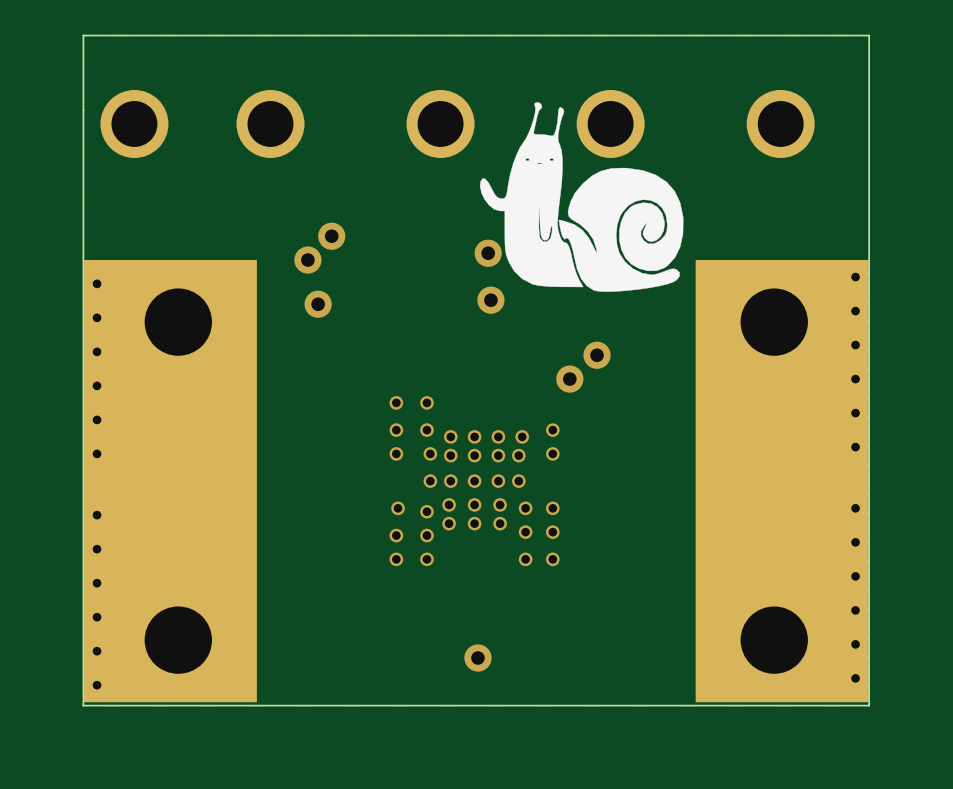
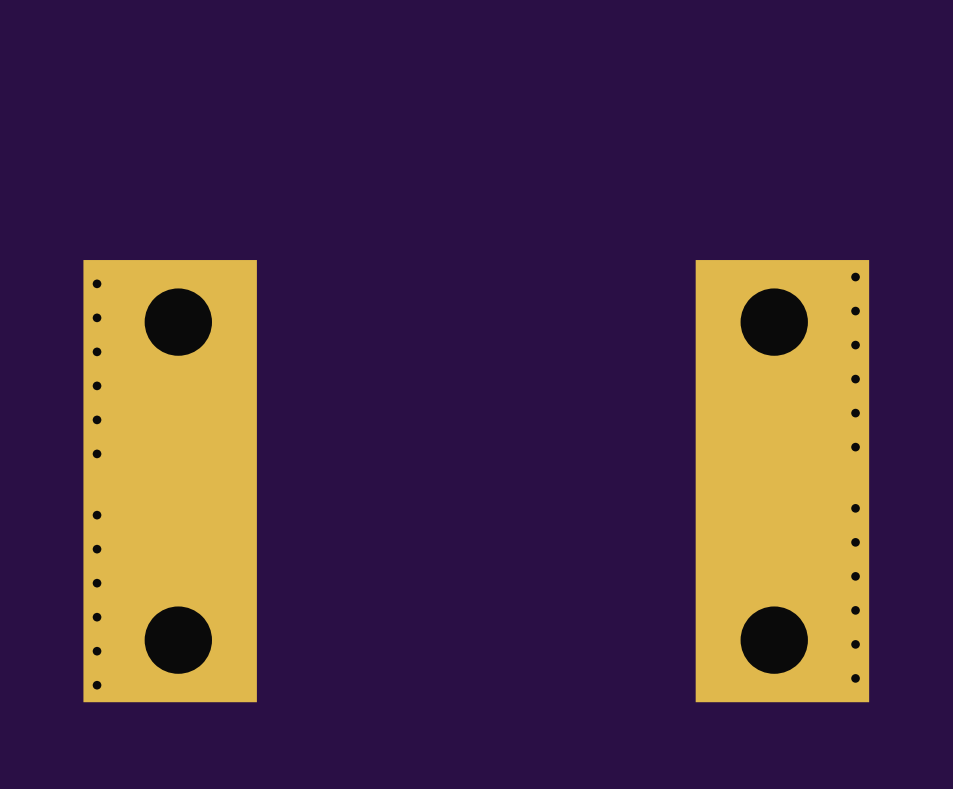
board edge: (869, 35) (869, 705) (83, 705) (83, 35) (869, 35) -> none
drawing: [479, 102, 684, 292] -> none
part: (134, 123) -> none
part: (270, 123) -> none
part: (440, 123) -> none
part: (610, 123) -> none
part: (780, 123) -> none
via: (331, 236) -> none
via: (488, 253) -> none
via: (307, 260) -> none
via: (490, 300) -> none
via: (318, 304) -> none
via: (597, 355) -> none
via: (569, 379) -> none
via: (396, 402) -> none
via: (426, 402) -> none
via: (396, 430) -> none
via: (426, 430) -> none
via: (552, 430) -> none
via: (450, 436) -> none
via: (474, 436) -> none
via: (498, 436) -> none
via: (522, 436) -> none
via: (396, 453) -> none
via: (430, 453) -> none
via: (552, 453) -> none
via: (450, 455) -> none
via: (474, 455) -> none
via: (498, 455) -> none
via: (518, 455) -> none
via: (430, 481) -> none
via: (450, 481) -> none
via: (474, 481) -> none
via: (498, 481) -> none
via: (518, 481) -> none
via: (449, 504) -> none
via: (474, 504) -> none
via: (500, 504) -> none
via: (398, 508) -> none
via: (525, 508) -> none
via: (552, 508) -> none
via: (426, 511) -> none
via: (449, 523) -> none
via: (474, 523) -> none
via: (500, 523) -> none
via: (525, 532) -> none
via: (552, 532) -> none
via: (396, 535) -> none
via: (426, 535) -> none
via: (396, 559) -> none
via: (426, 559) -> none
via: (525, 559) -> none
via: (552, 559) -> none
via: (477, 658) -> none

